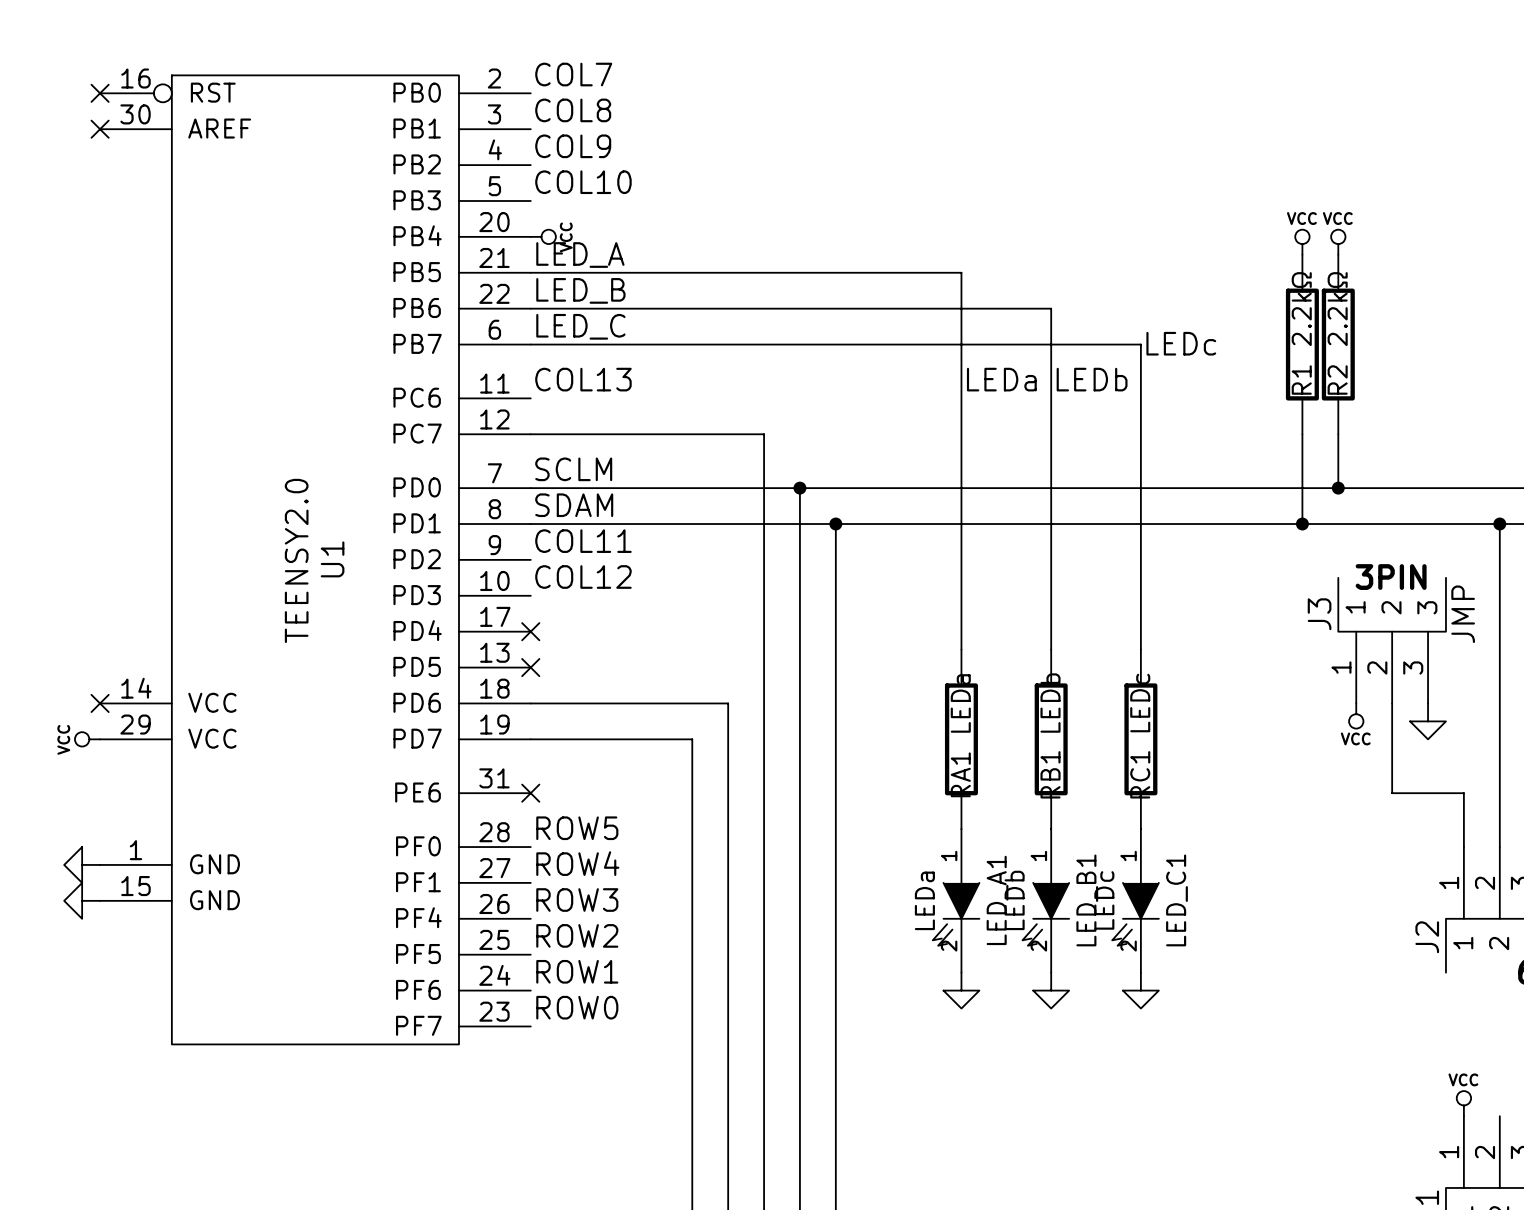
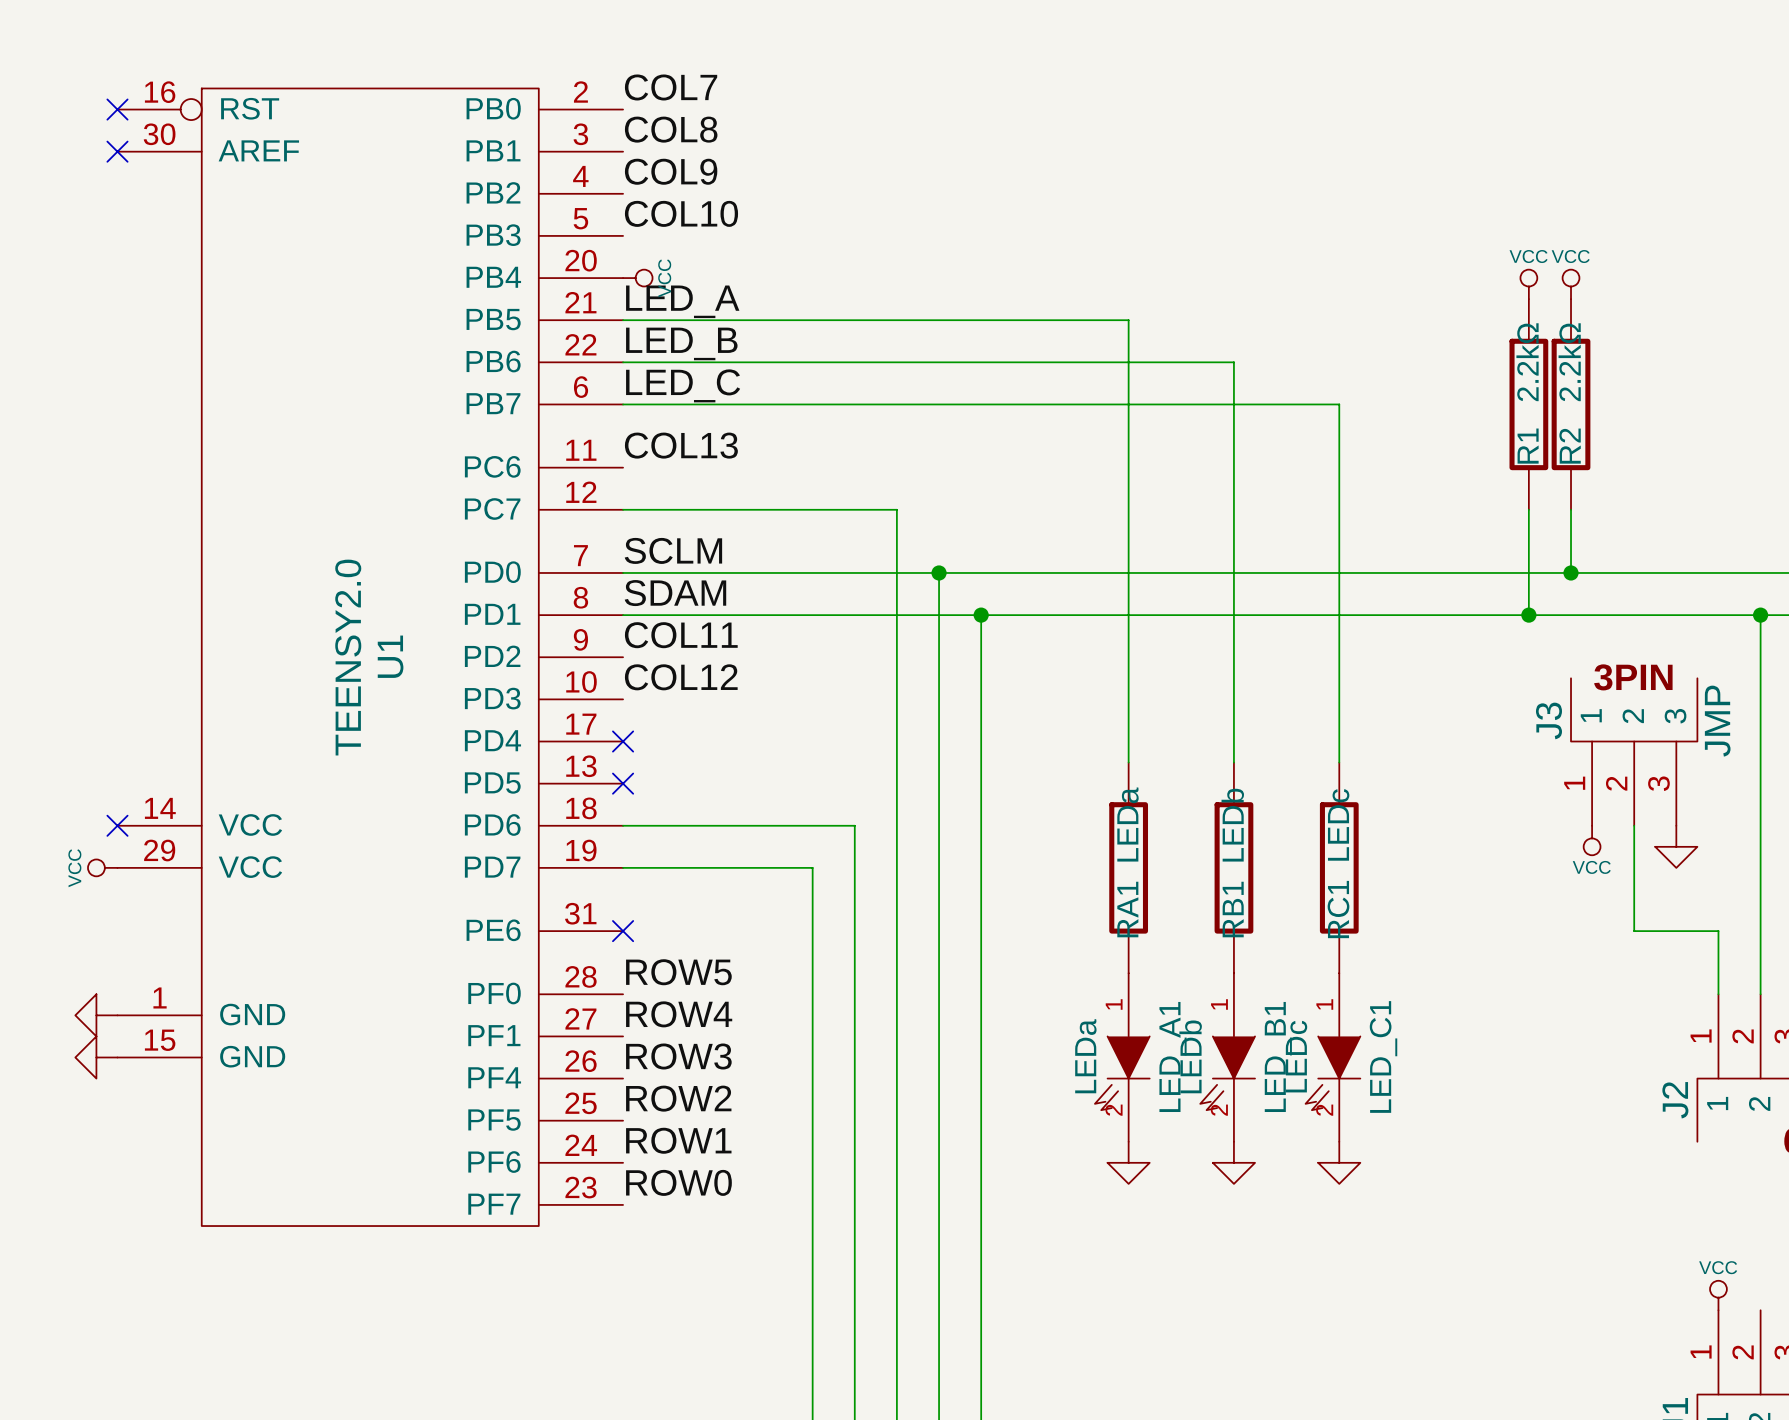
label: LEDc (1181, 343) -> none
label: LEDa (1001, 379) -> none
label: LEDb (1092, 379) -> none

